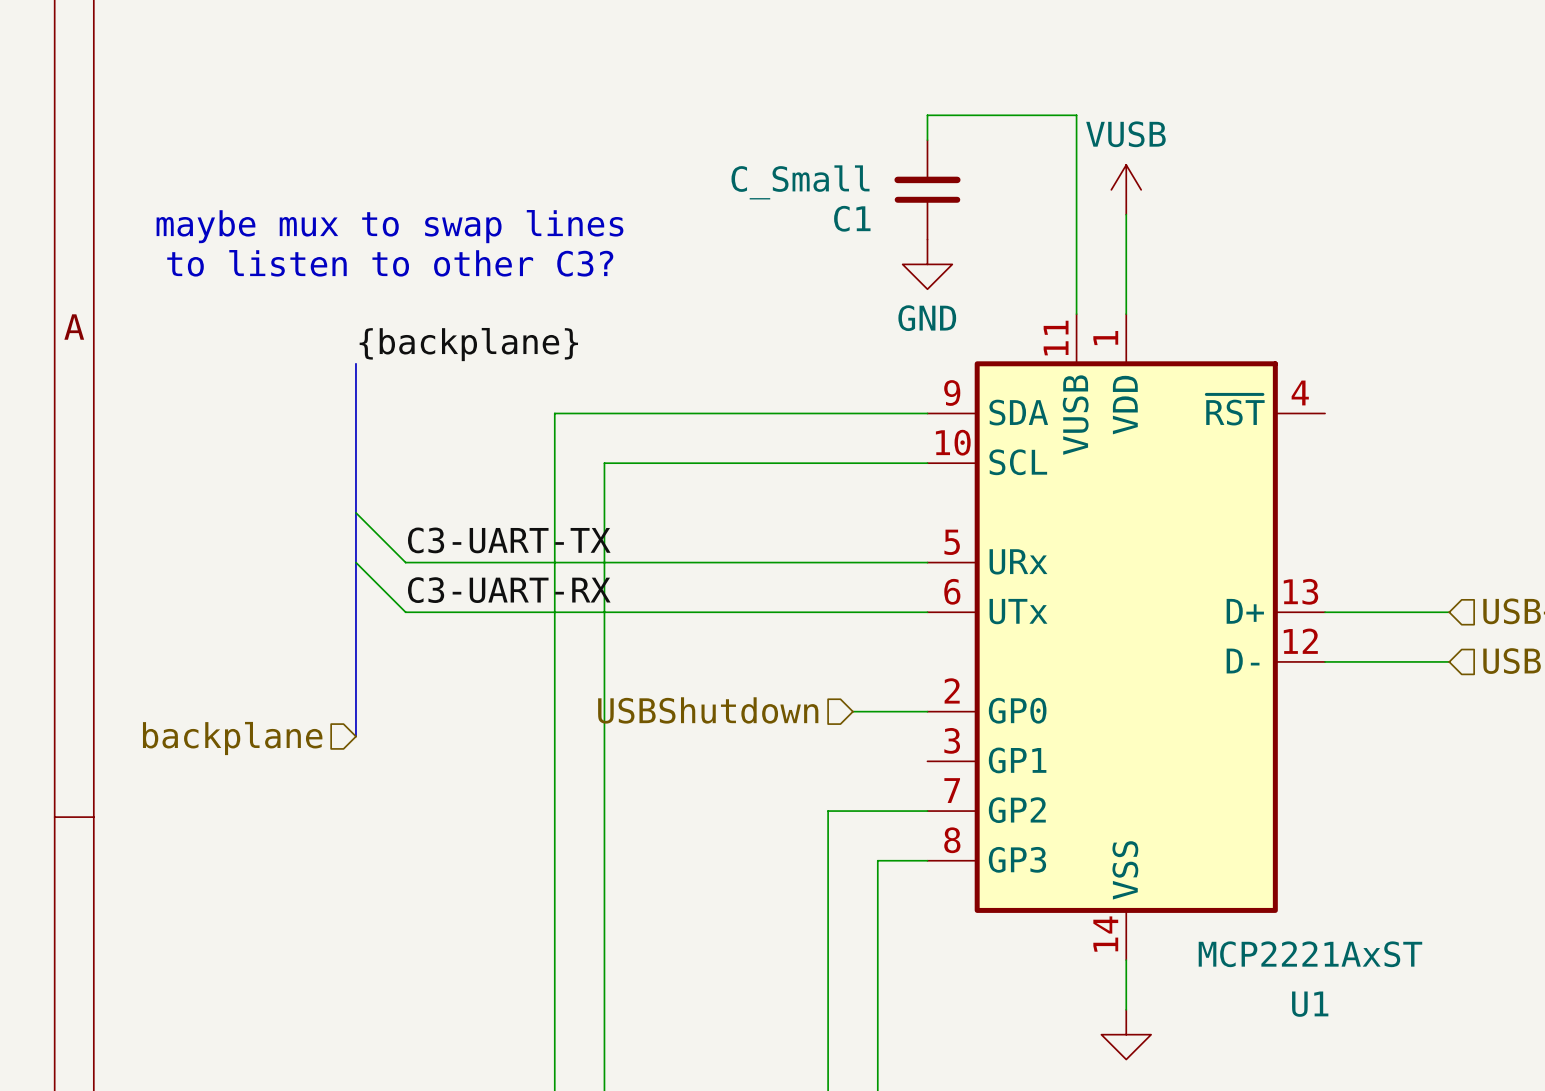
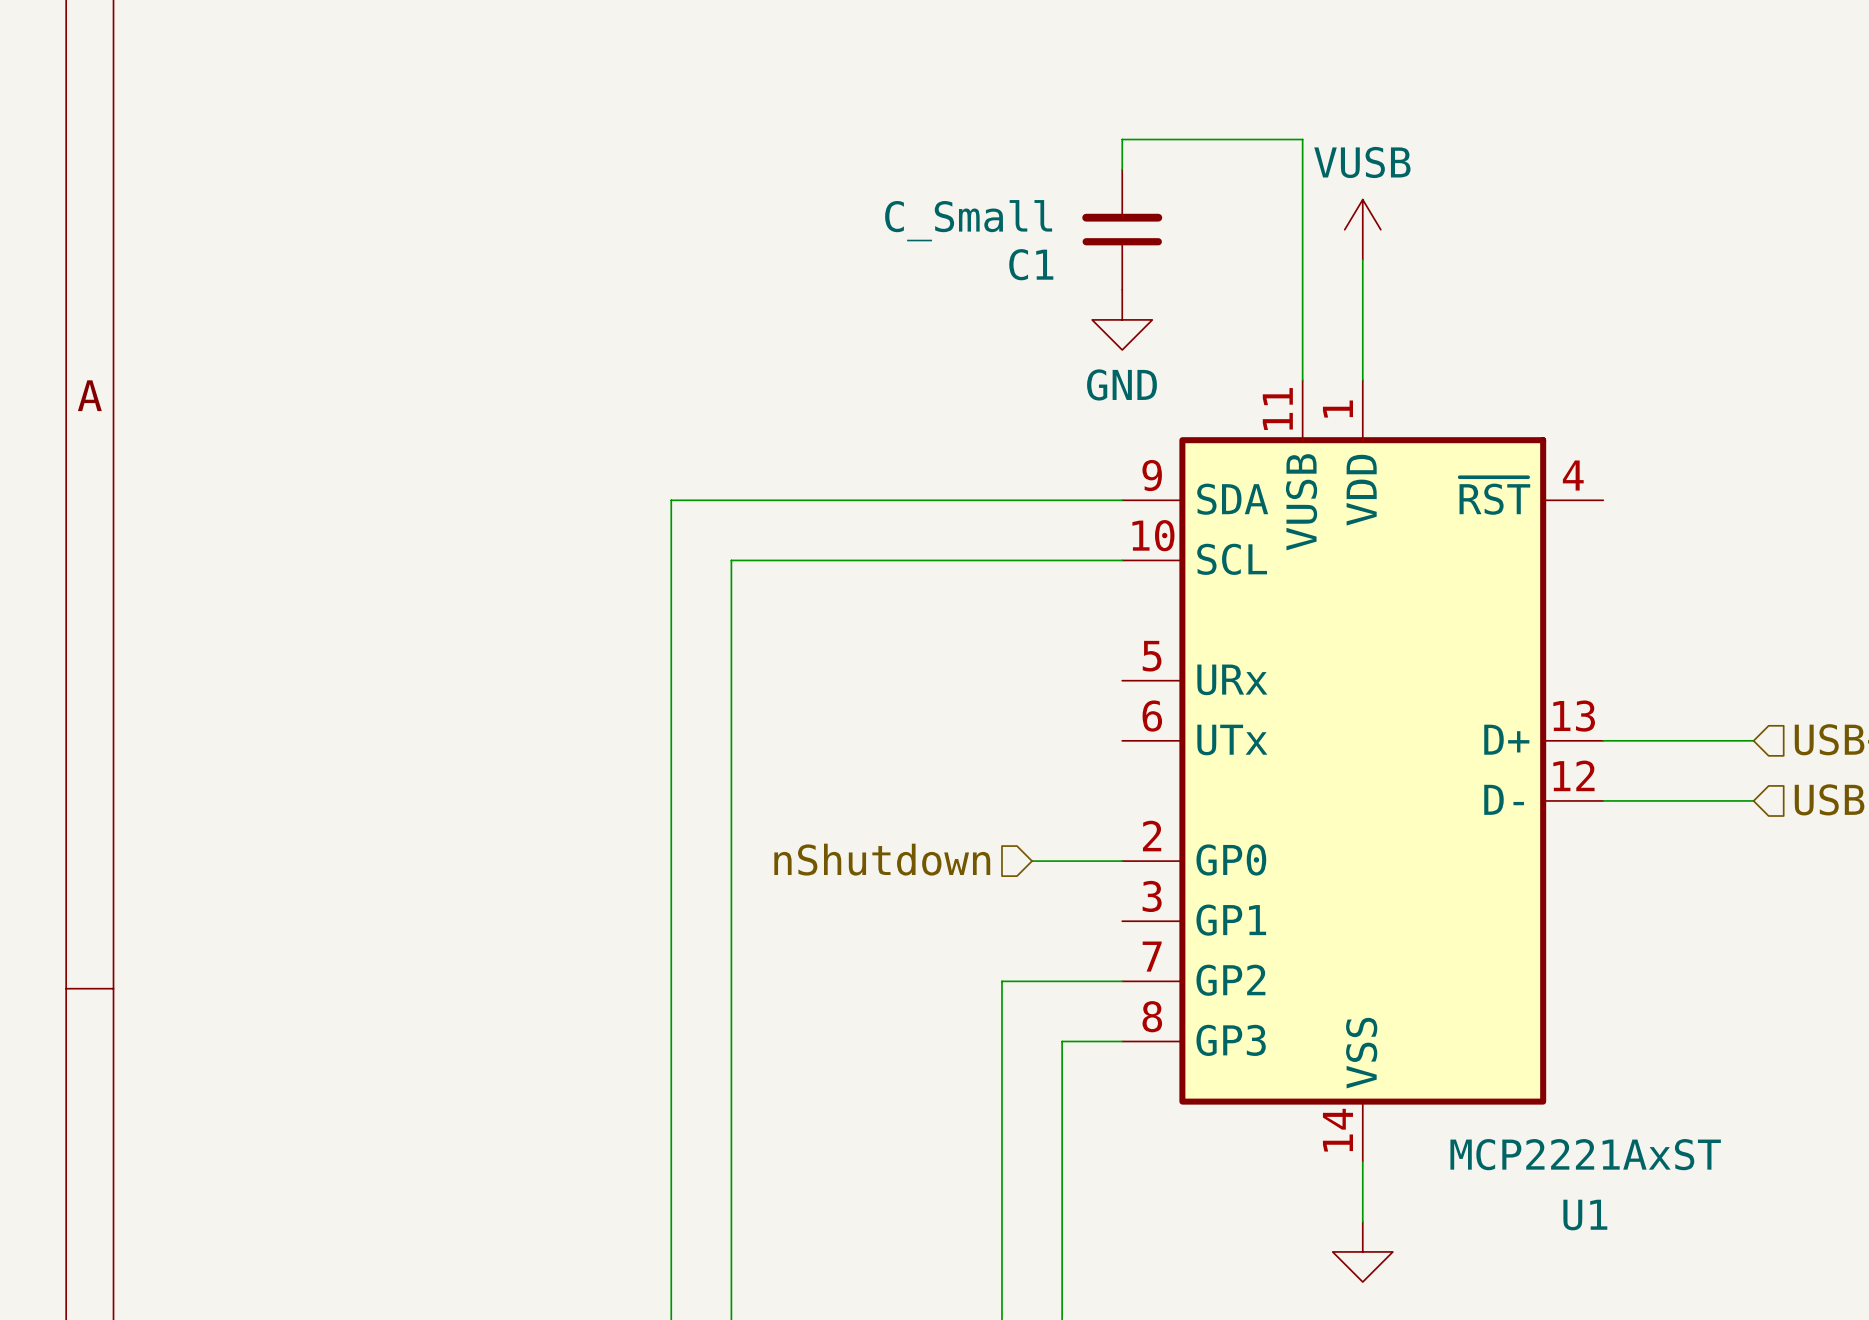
text: maybe mux to swap lines (389, 226) -> none
text: to listen to other C3? (390, 263) -> none
label: {backplane} (468, 344) -> none
bus: (355, 363) (355, 736) -> none
wire: (355, 512) (405, 562) (927, 562) -> none
label: C3-UART-TX (509, 540) -> none
wire: (355, 562) (405, 612) (927, 612) -> none
label: C3-UART-RX (509, 590) -> none
hierarchical label: USBShutdown (708, 710) -> nShutdown (882, 859)
hierarchical label: backplane (232, 738) -> none

